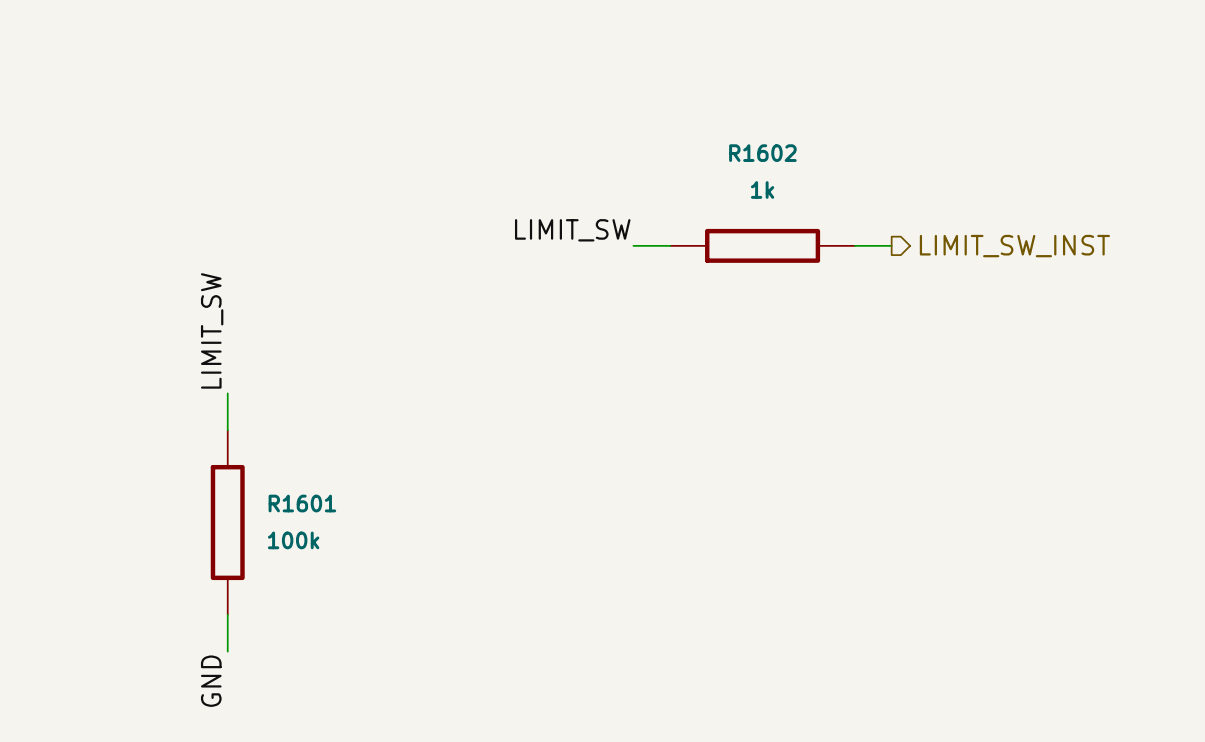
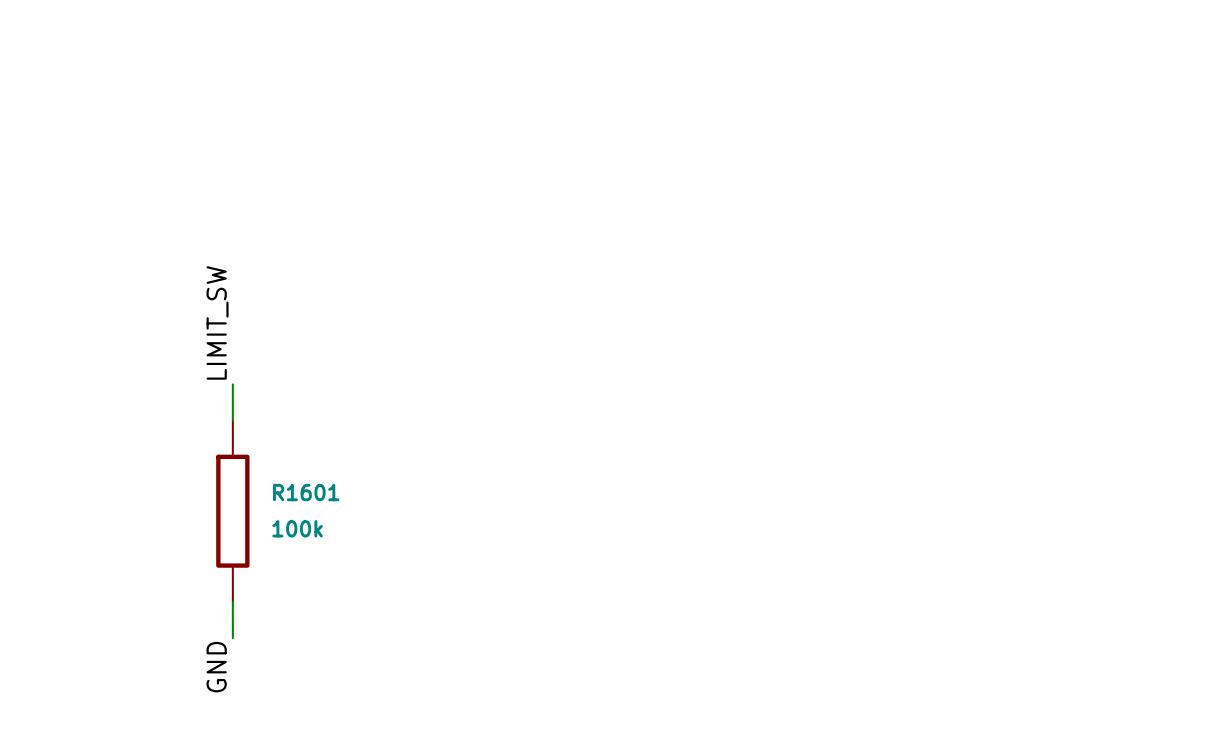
label: LIMIT_SW (572, 230) -> none
wire: (633, 245) (670, 245) -> none
R1602: 1k (762, 245) -> none
wire: (854, 245) (891, 245) -> none
hierarchical label: LIMIT_SW_INST (1014, 246) -> none

